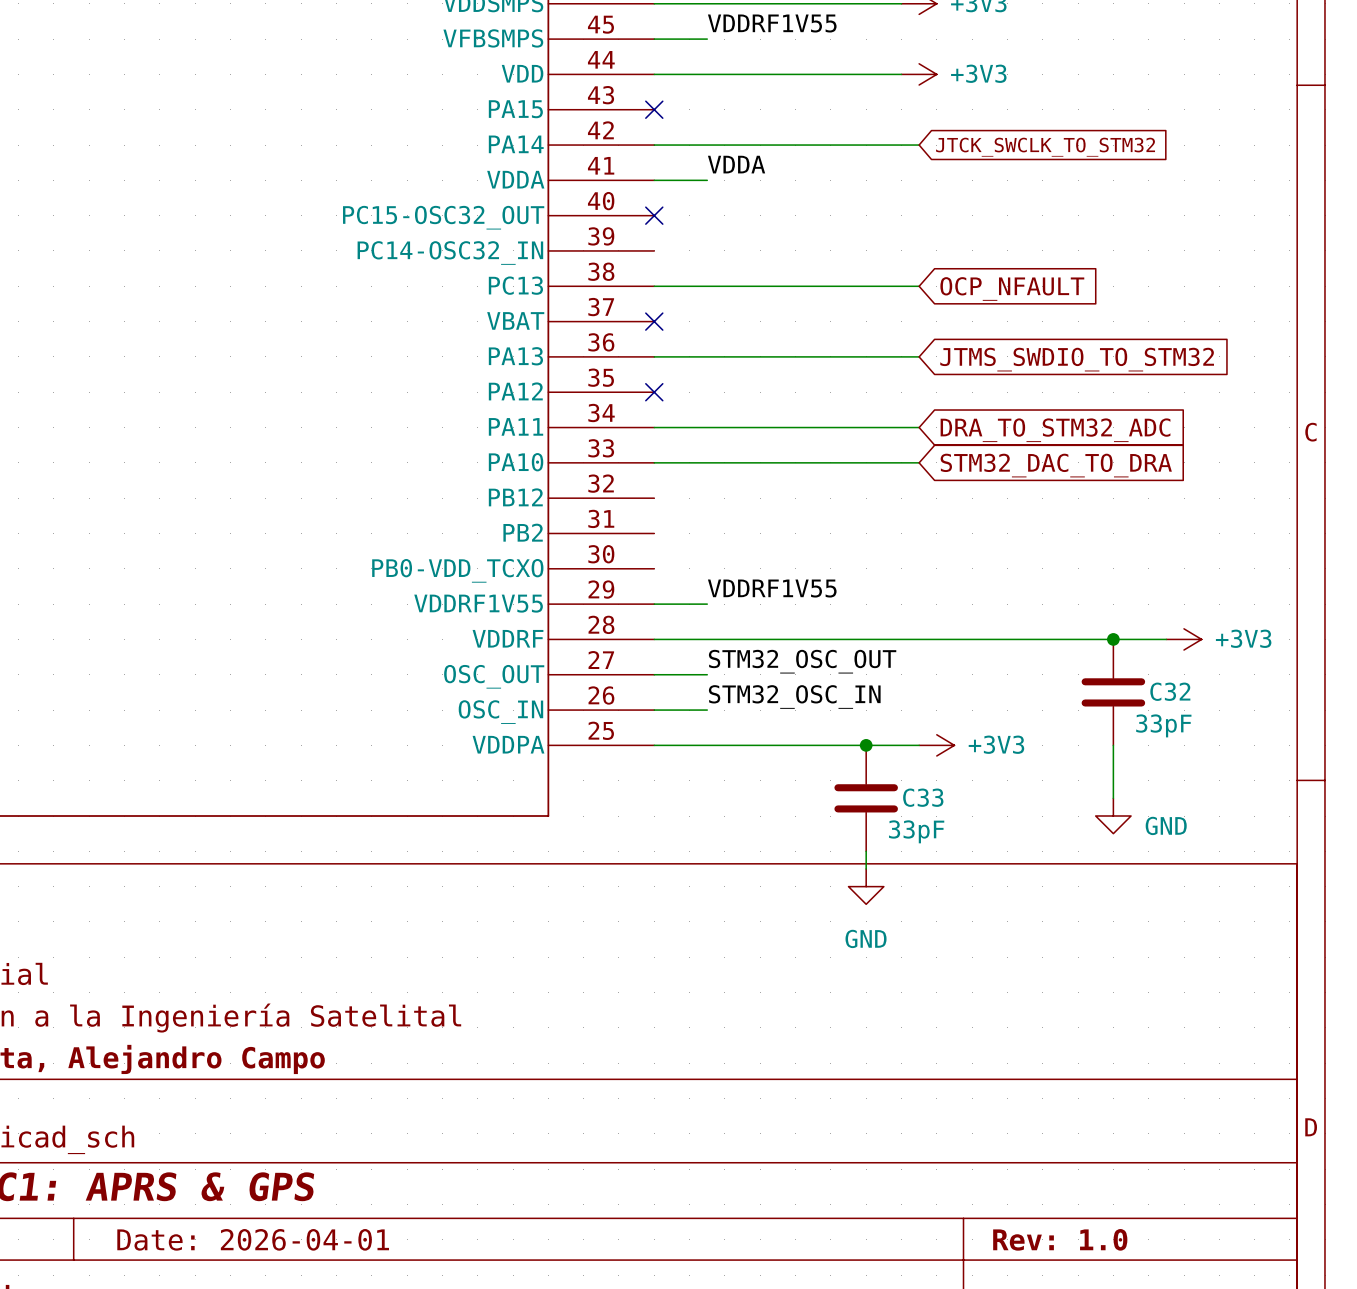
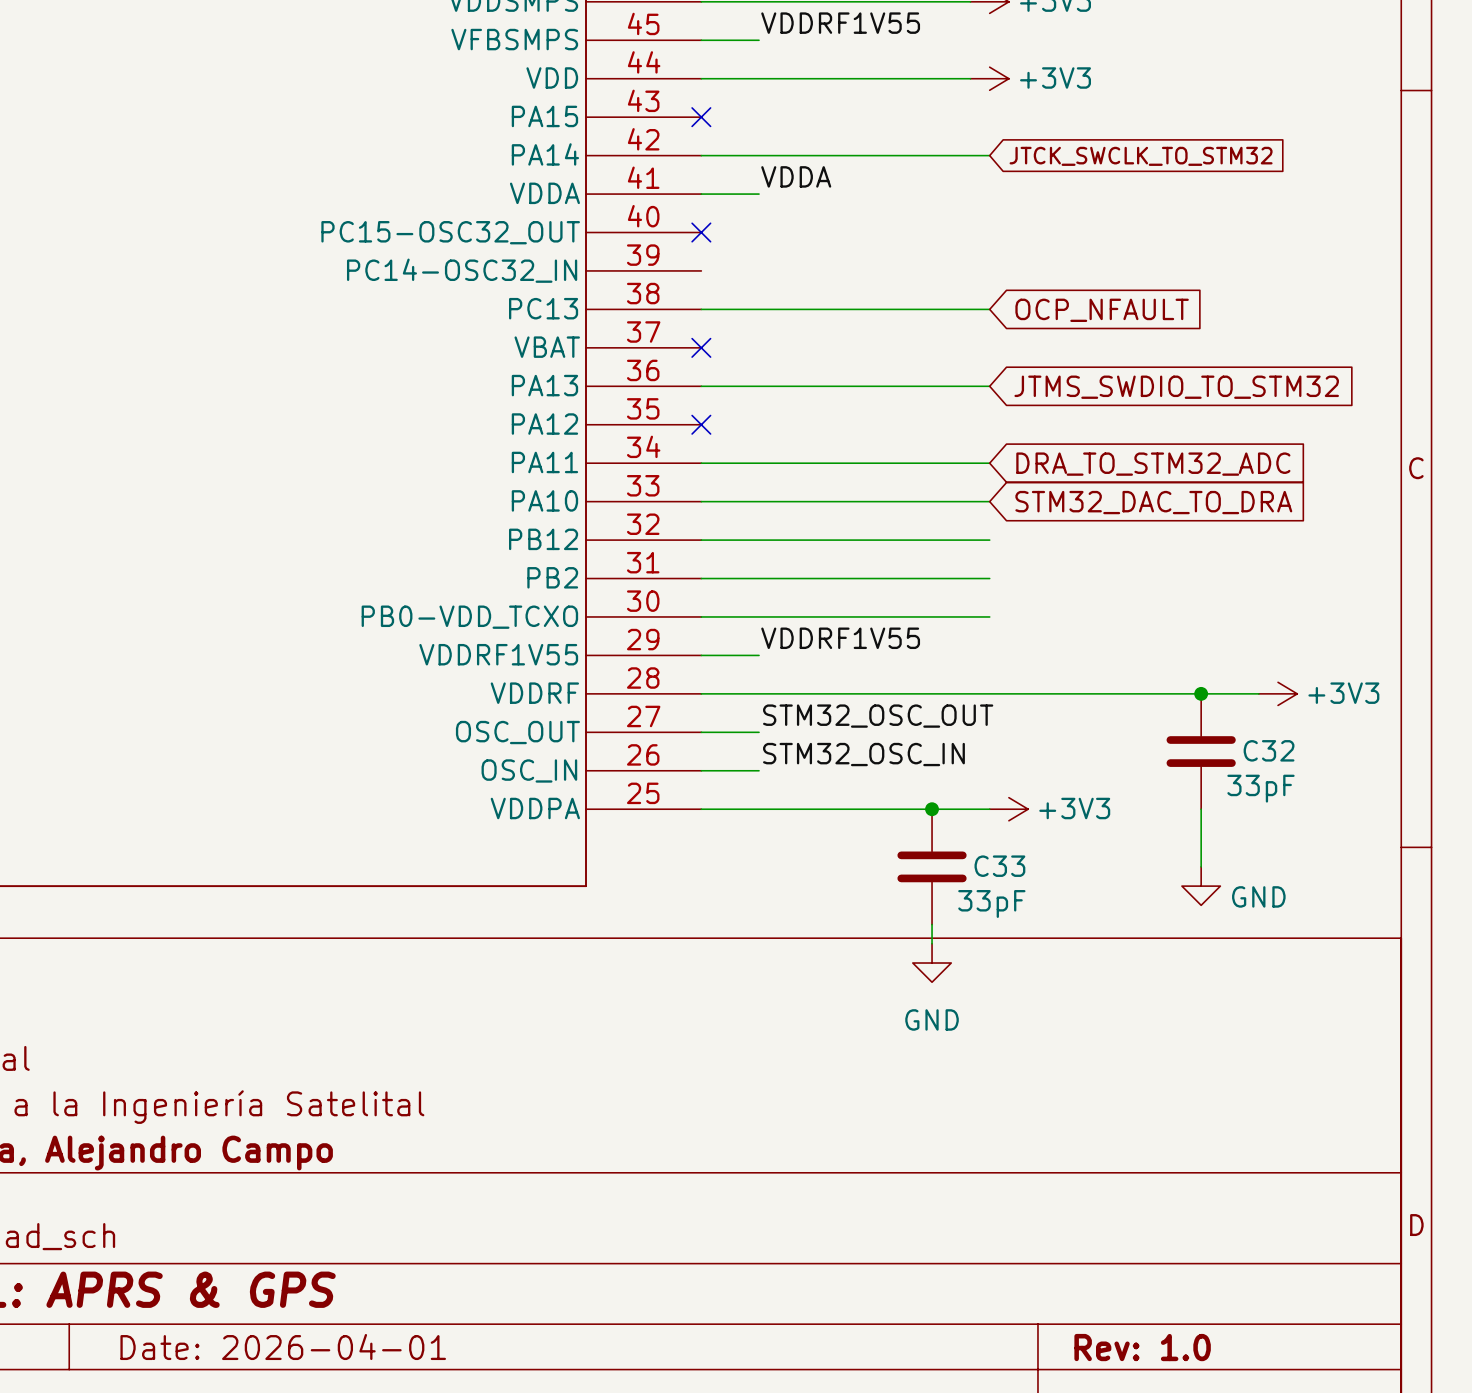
wire: none -> (701, 540) (989, 540)
wire: none -> (701, 578) (989, 578)
wire: none -> (701, 616) (989, 616)

